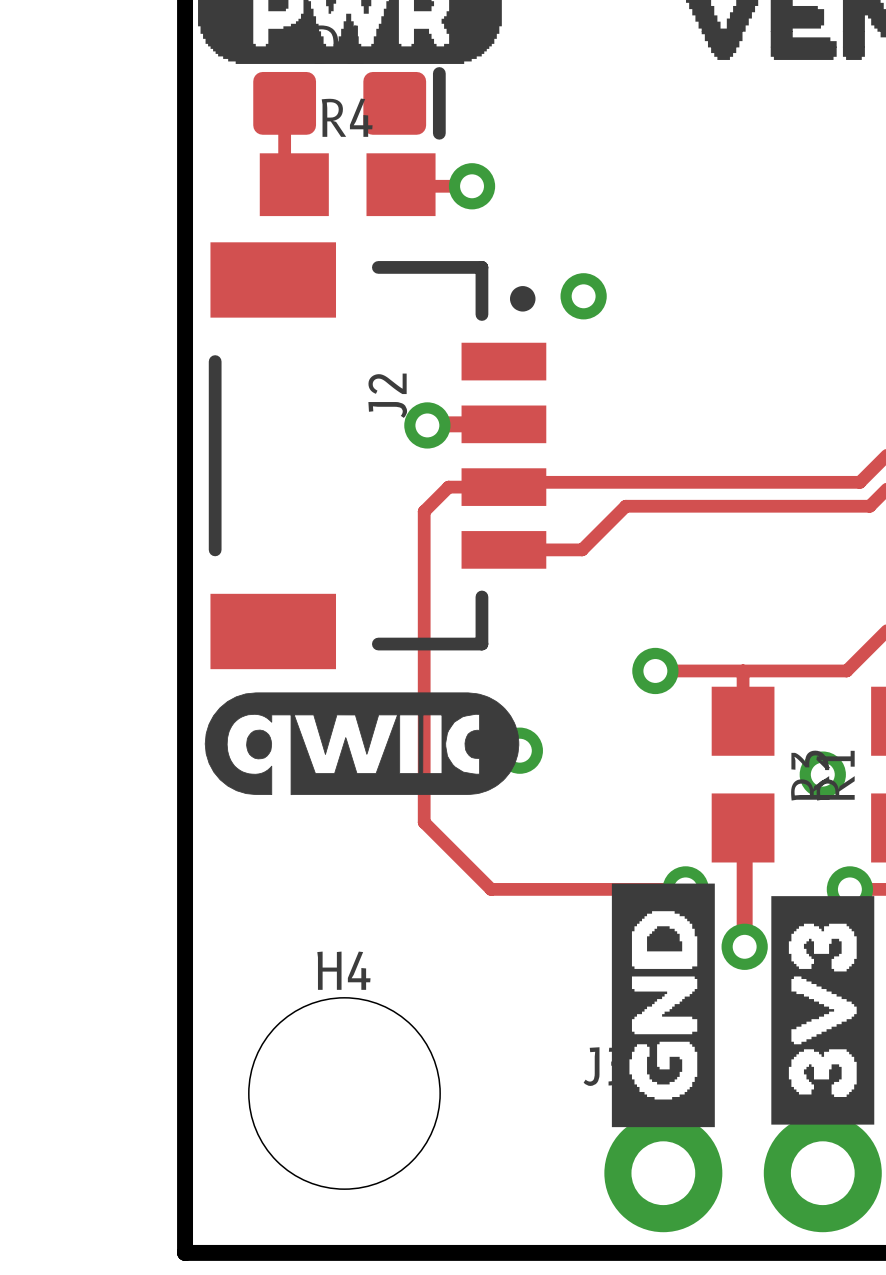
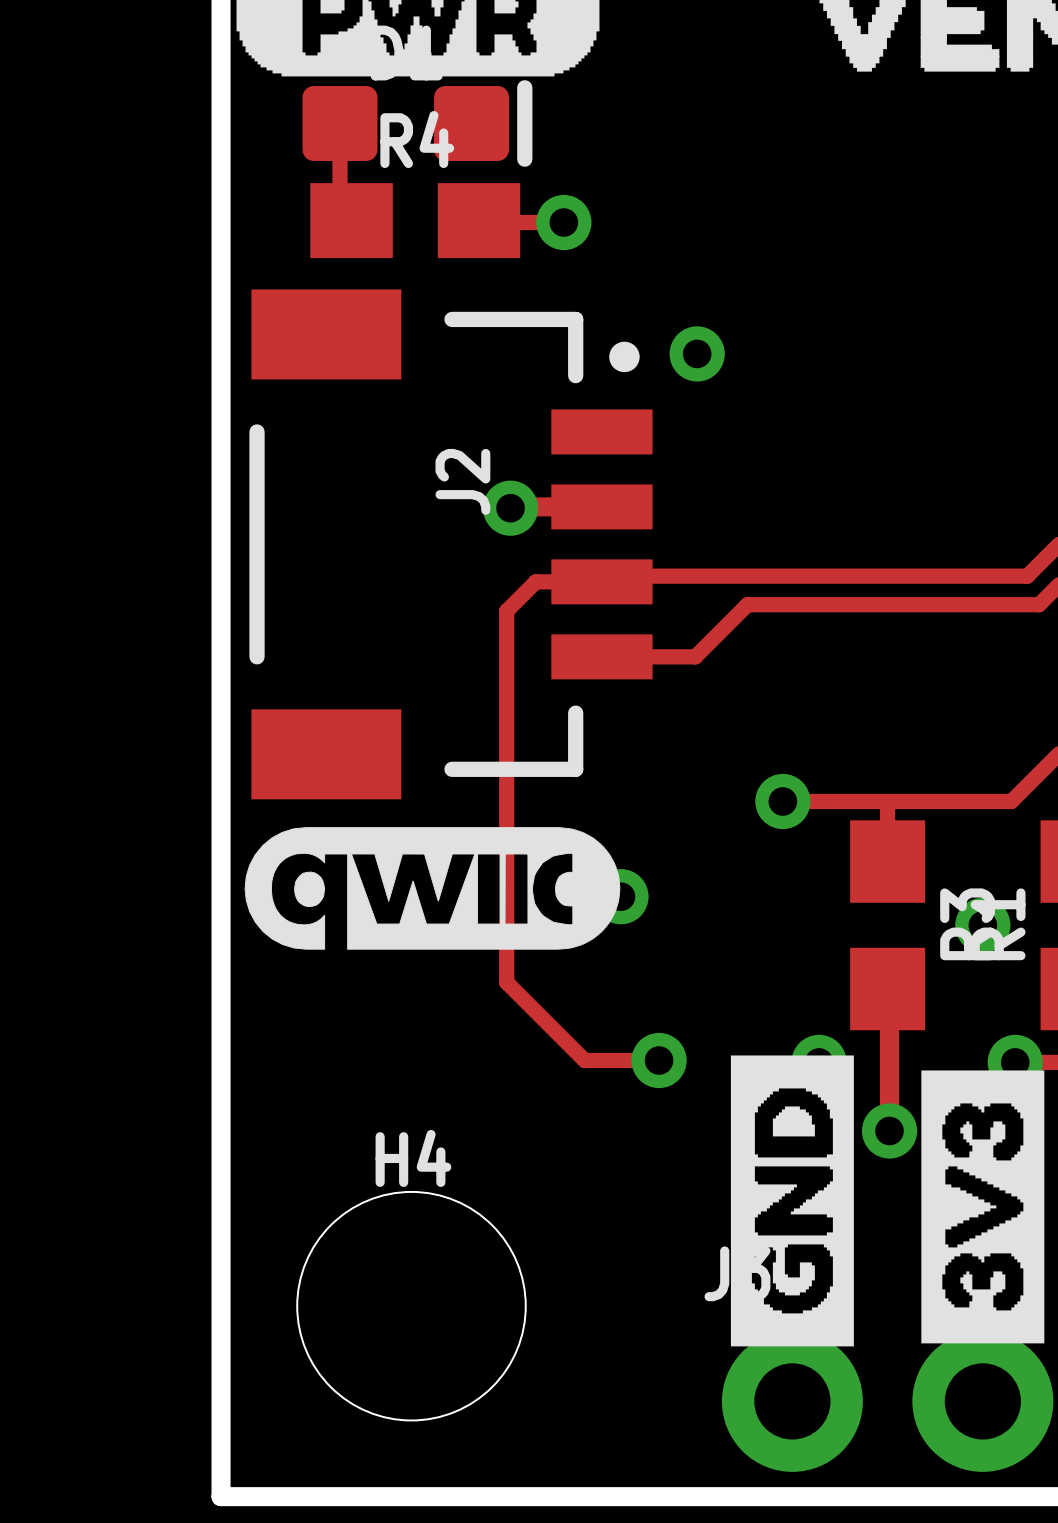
track: (489, 887) (491, 889) (685, 889) -> (584, 1060) (659, 1060)
via: none -> (659, 1060)

